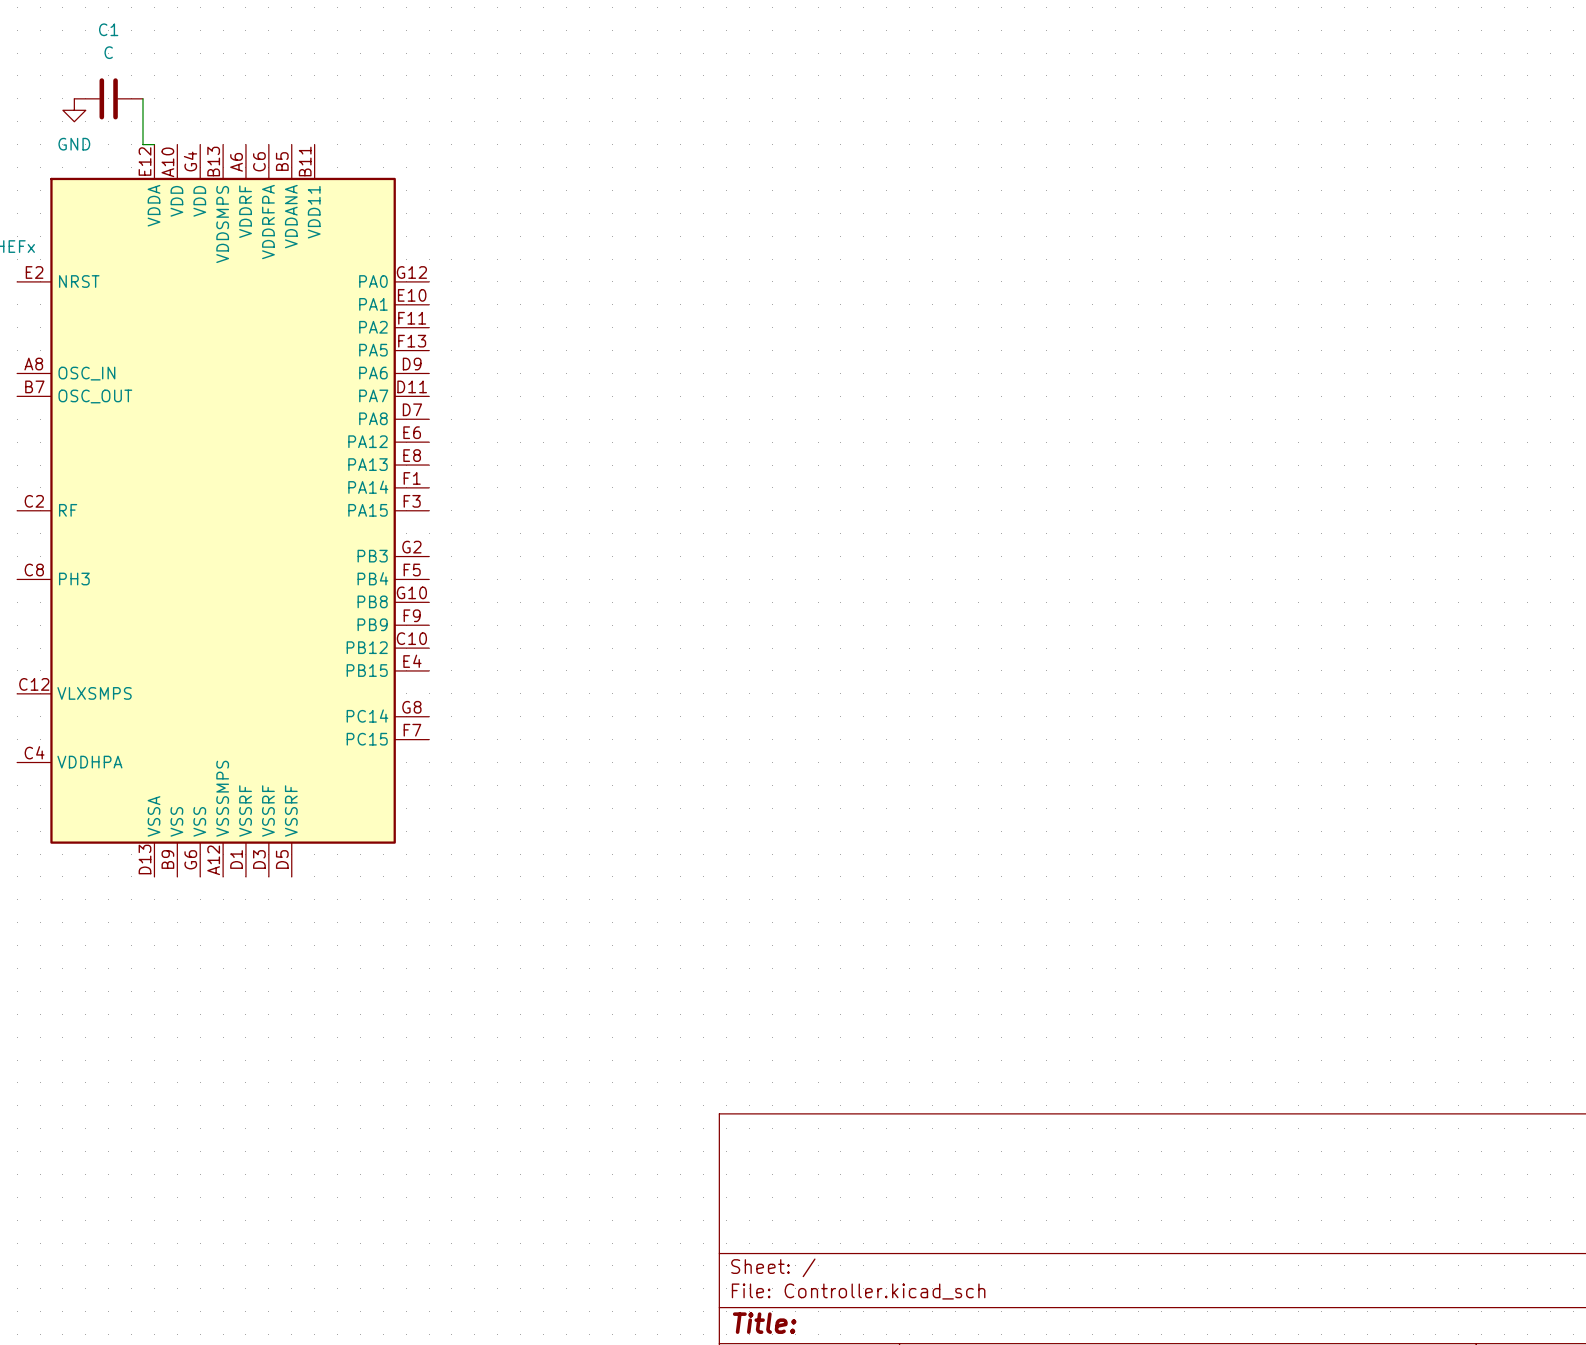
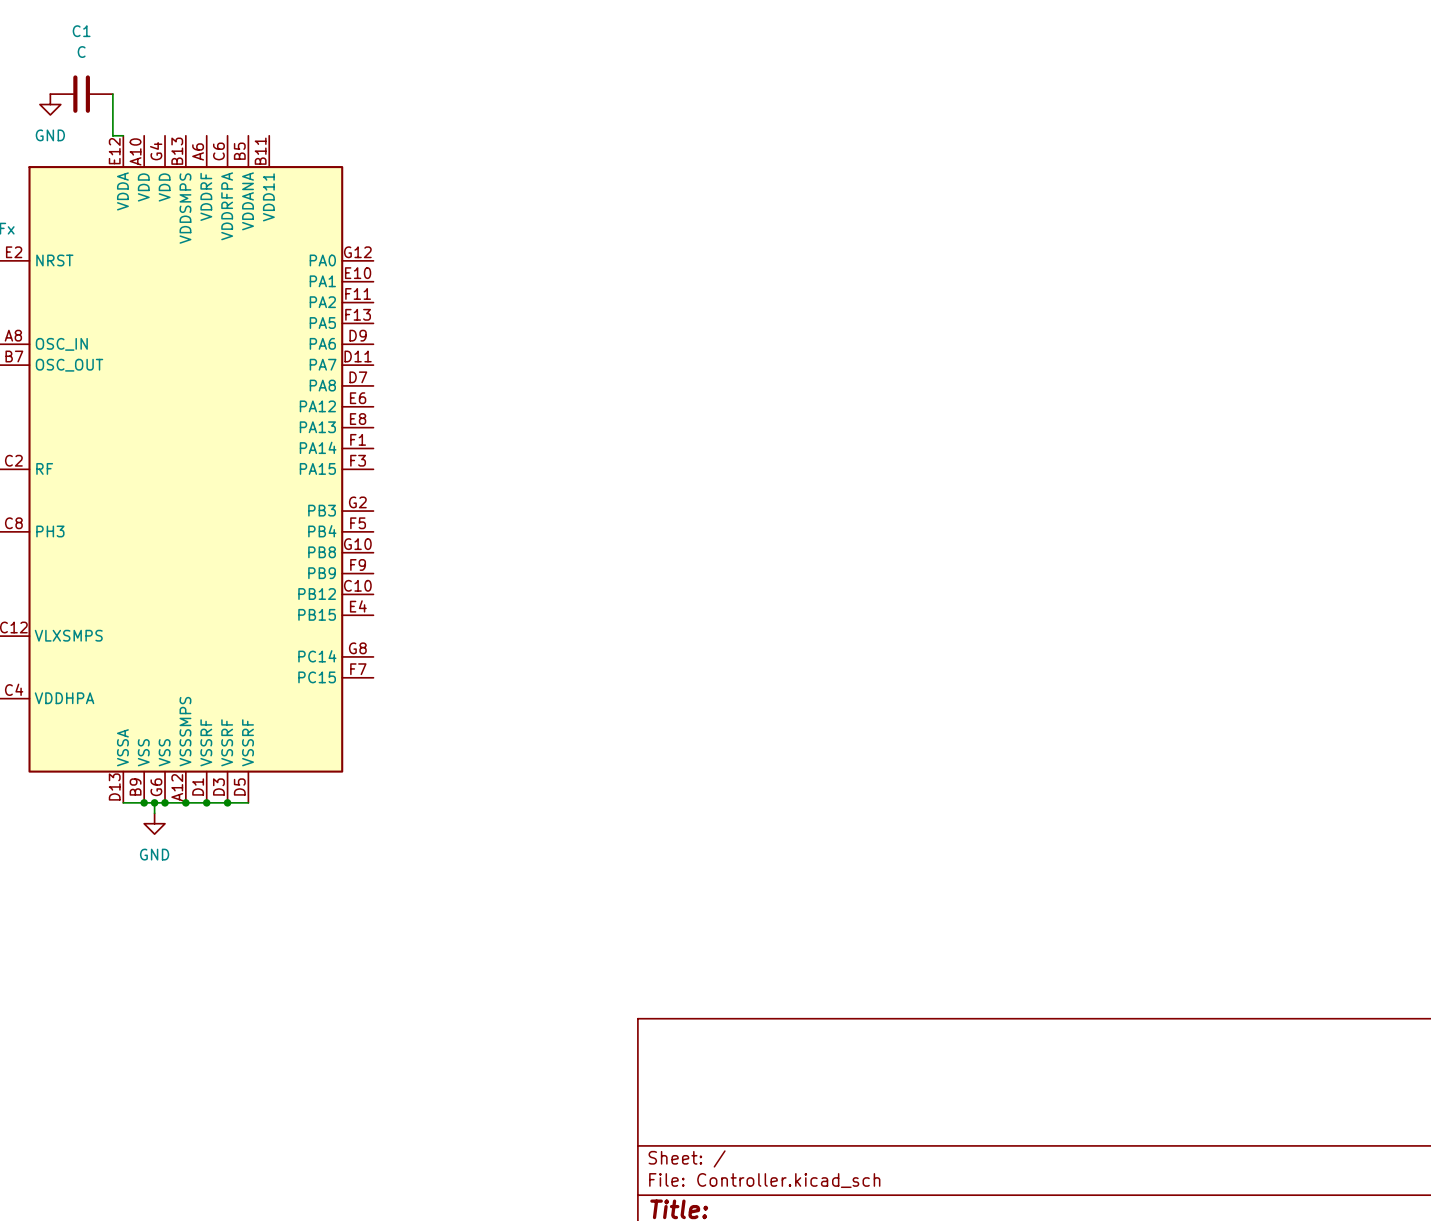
wire: none -> (123, 802) (248, 802)
junction: none -> (144, 802)
wire: none -> (154, 802) (154, 813)
junction: none -> (154, 802)
junction: none -> (165, 802)
junction: none -> (185, 802)
junction: none -> (206, 802)
junction: none -> (227, 802)
power symbol: none -> GND (154, 823)

